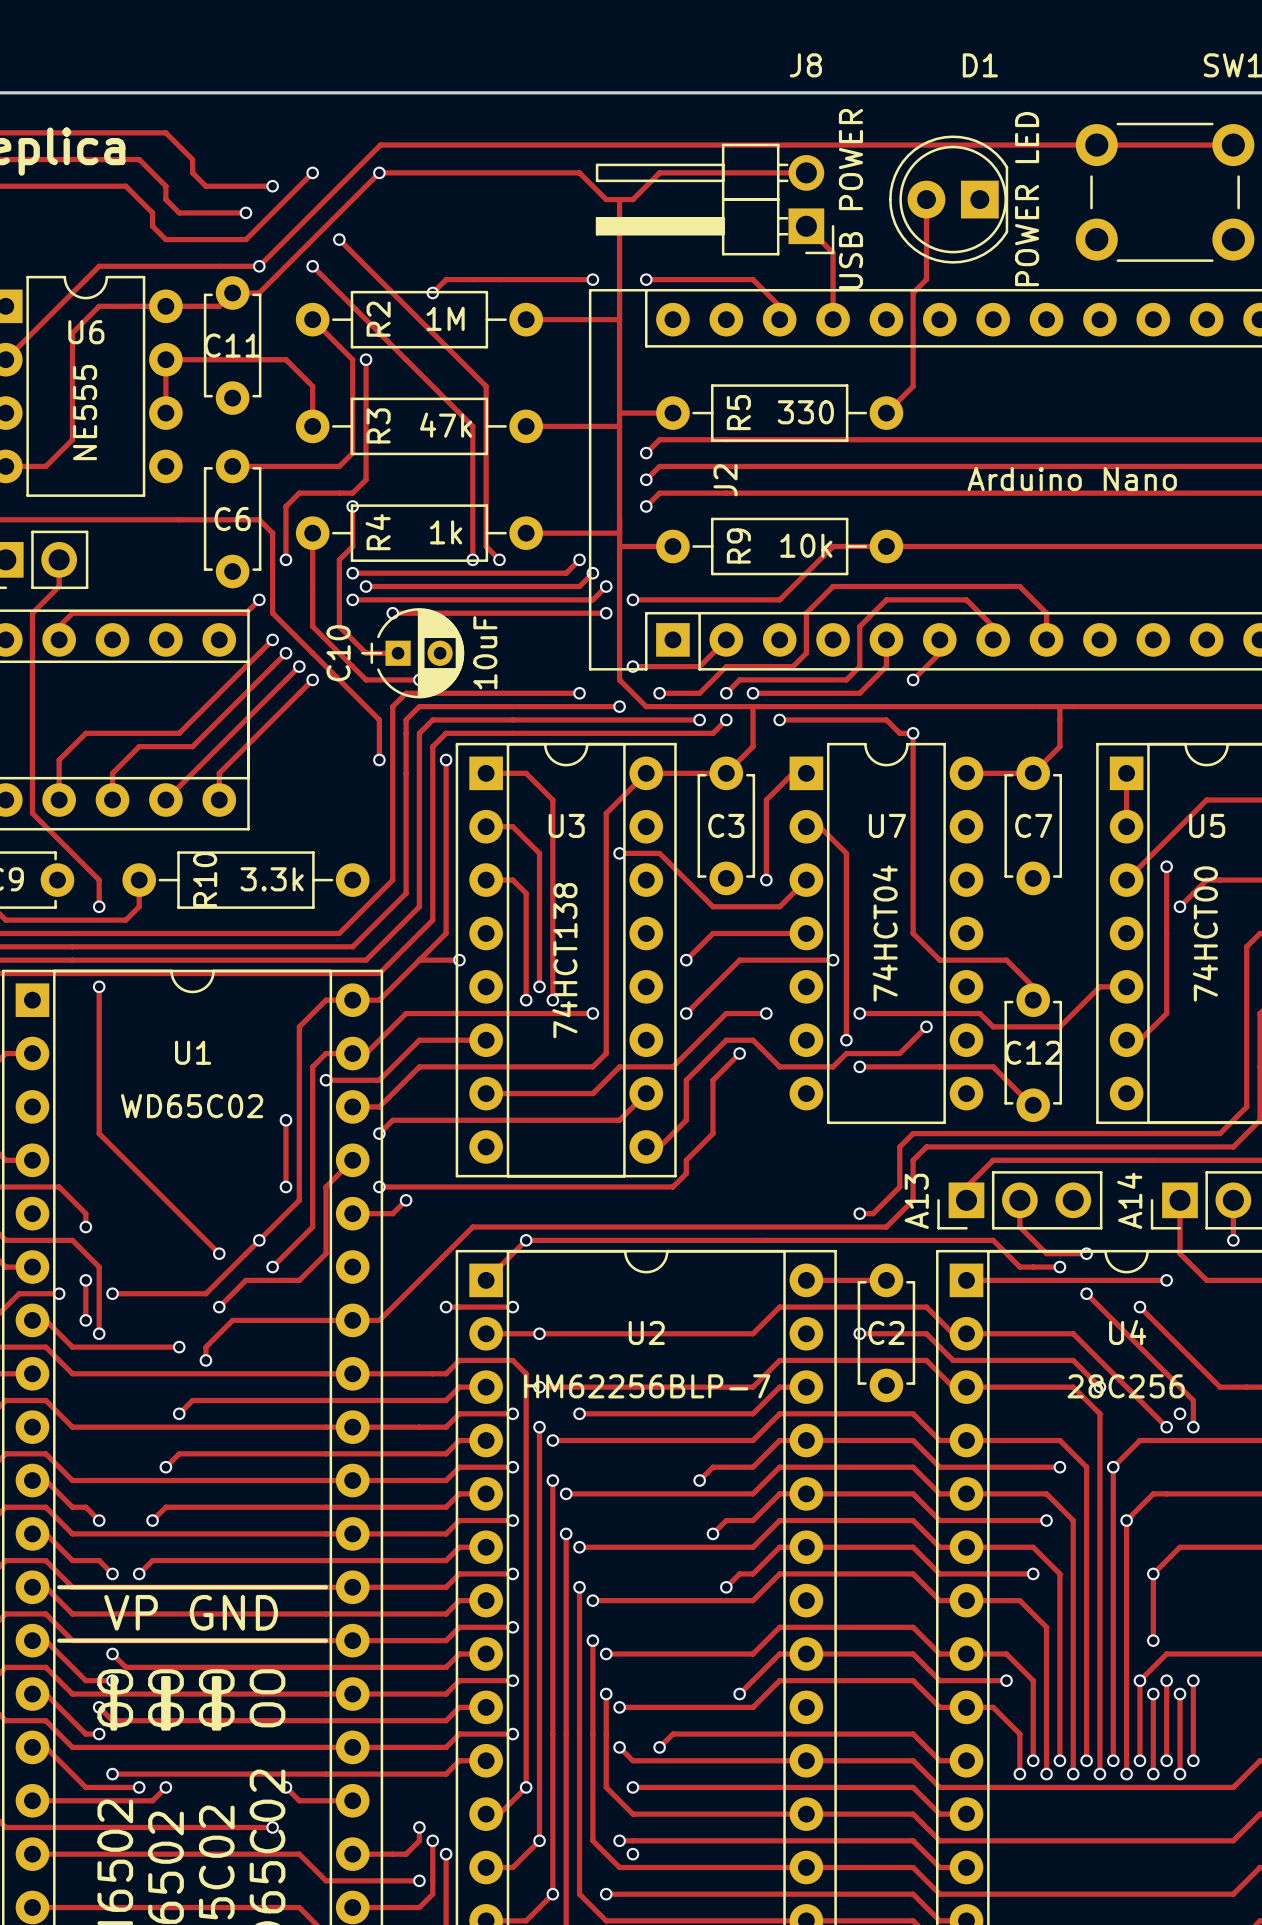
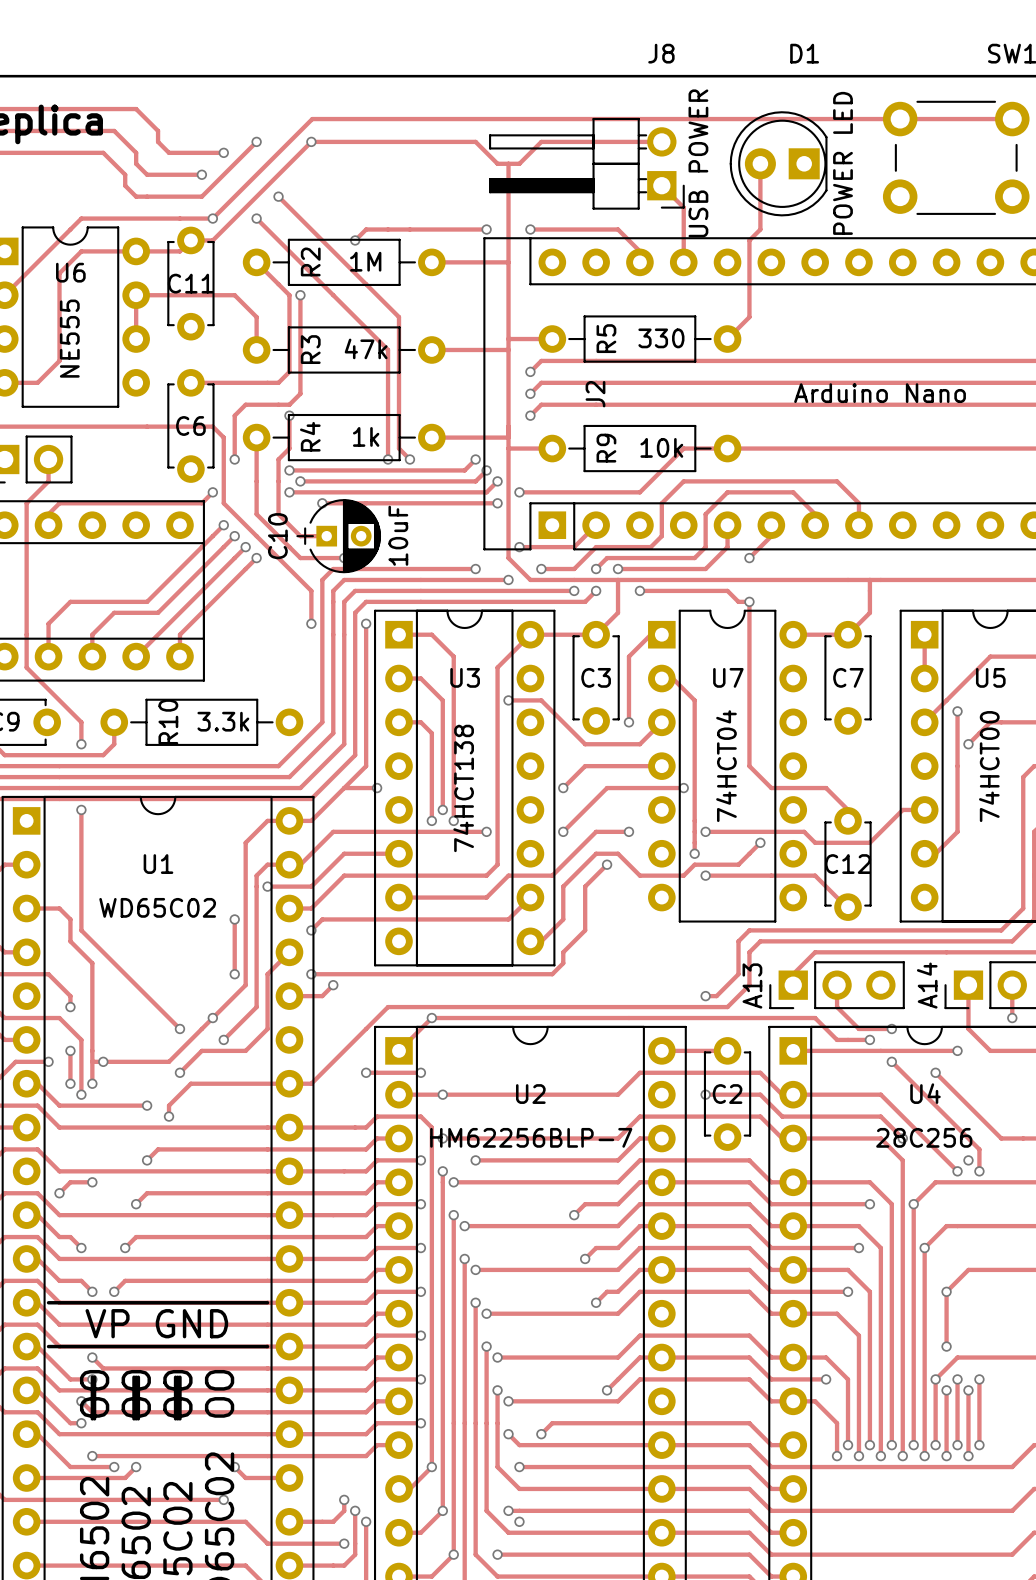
track: none -> (26, 908) (59, 908) (70, 919) (70, 941) (92, 963) (92, 1083)
via: (112, 1293) -> none
via: none -> (103, 1061)
via: none -> (92, 1083)
track: none -> (92, 1182) (70, 1182) (59, 1193)
via: none -> (92, 1182)
via: none -> (59, 1193)

